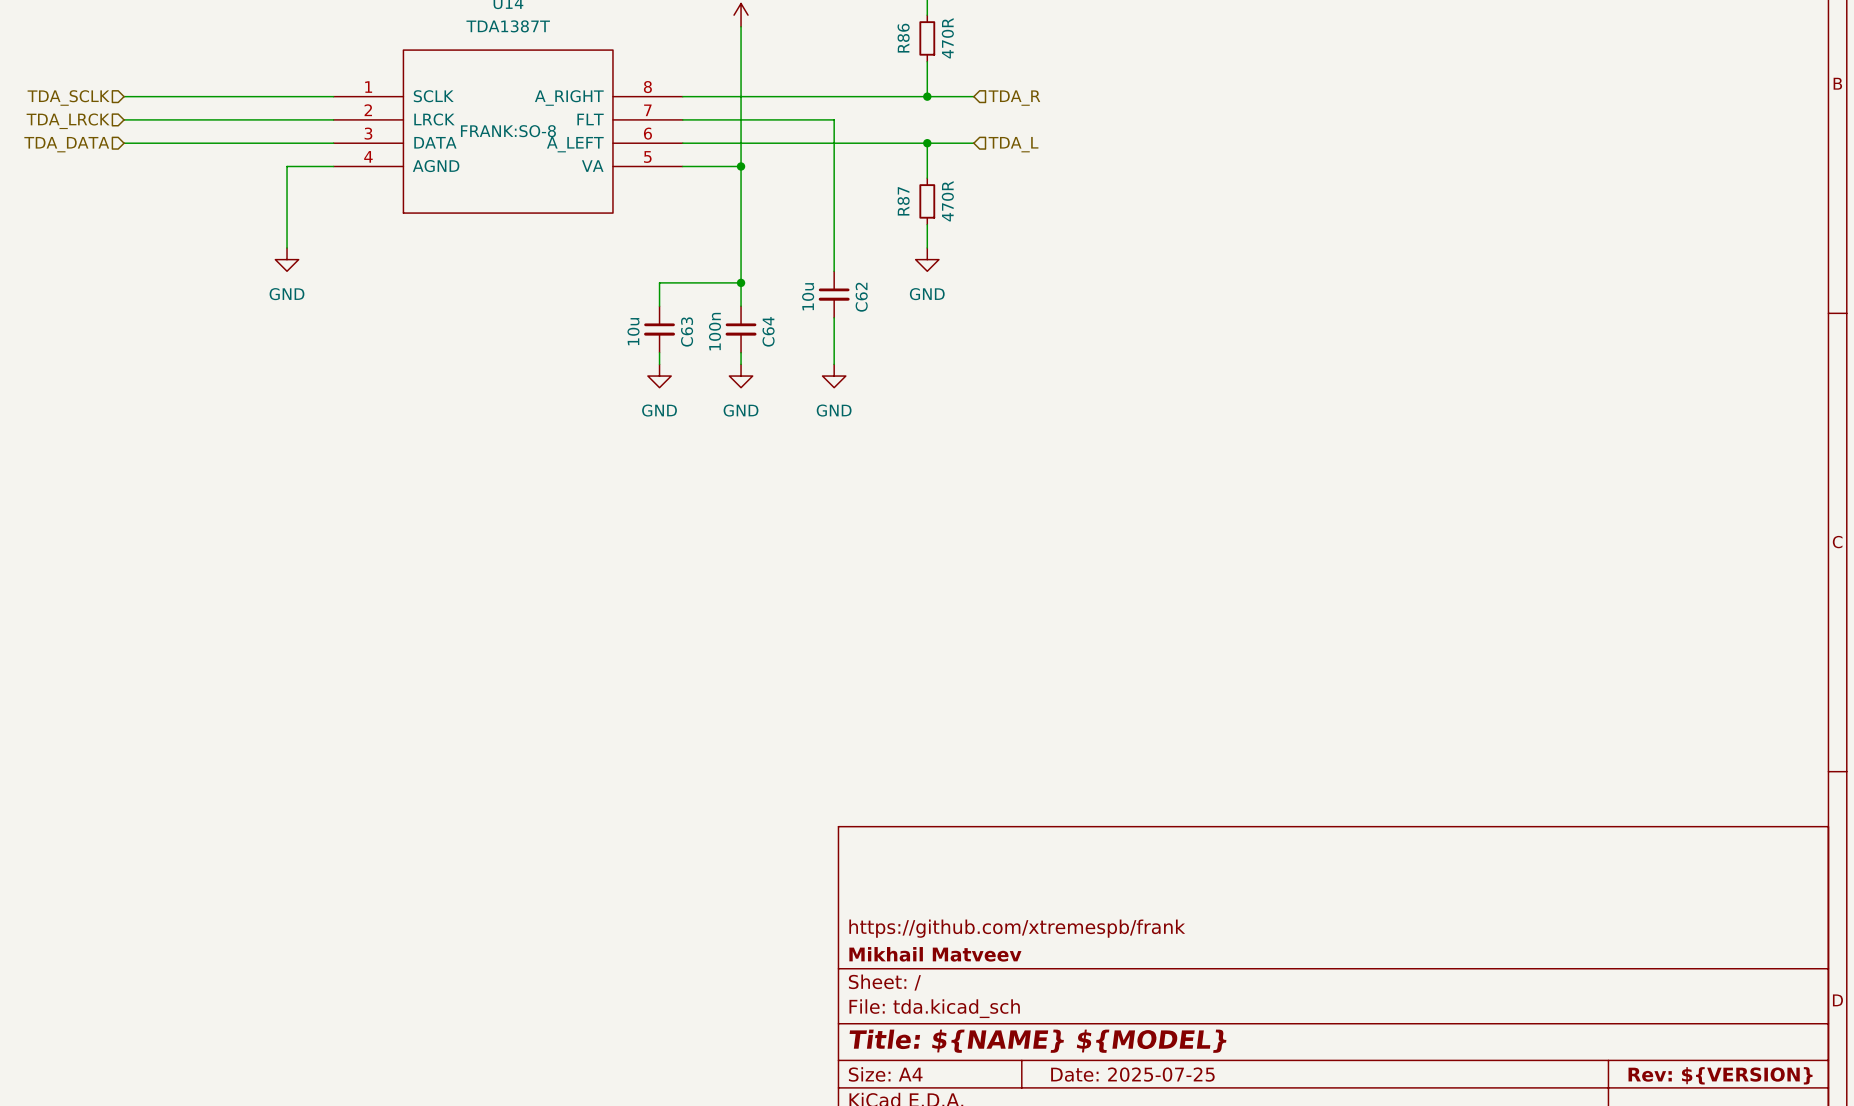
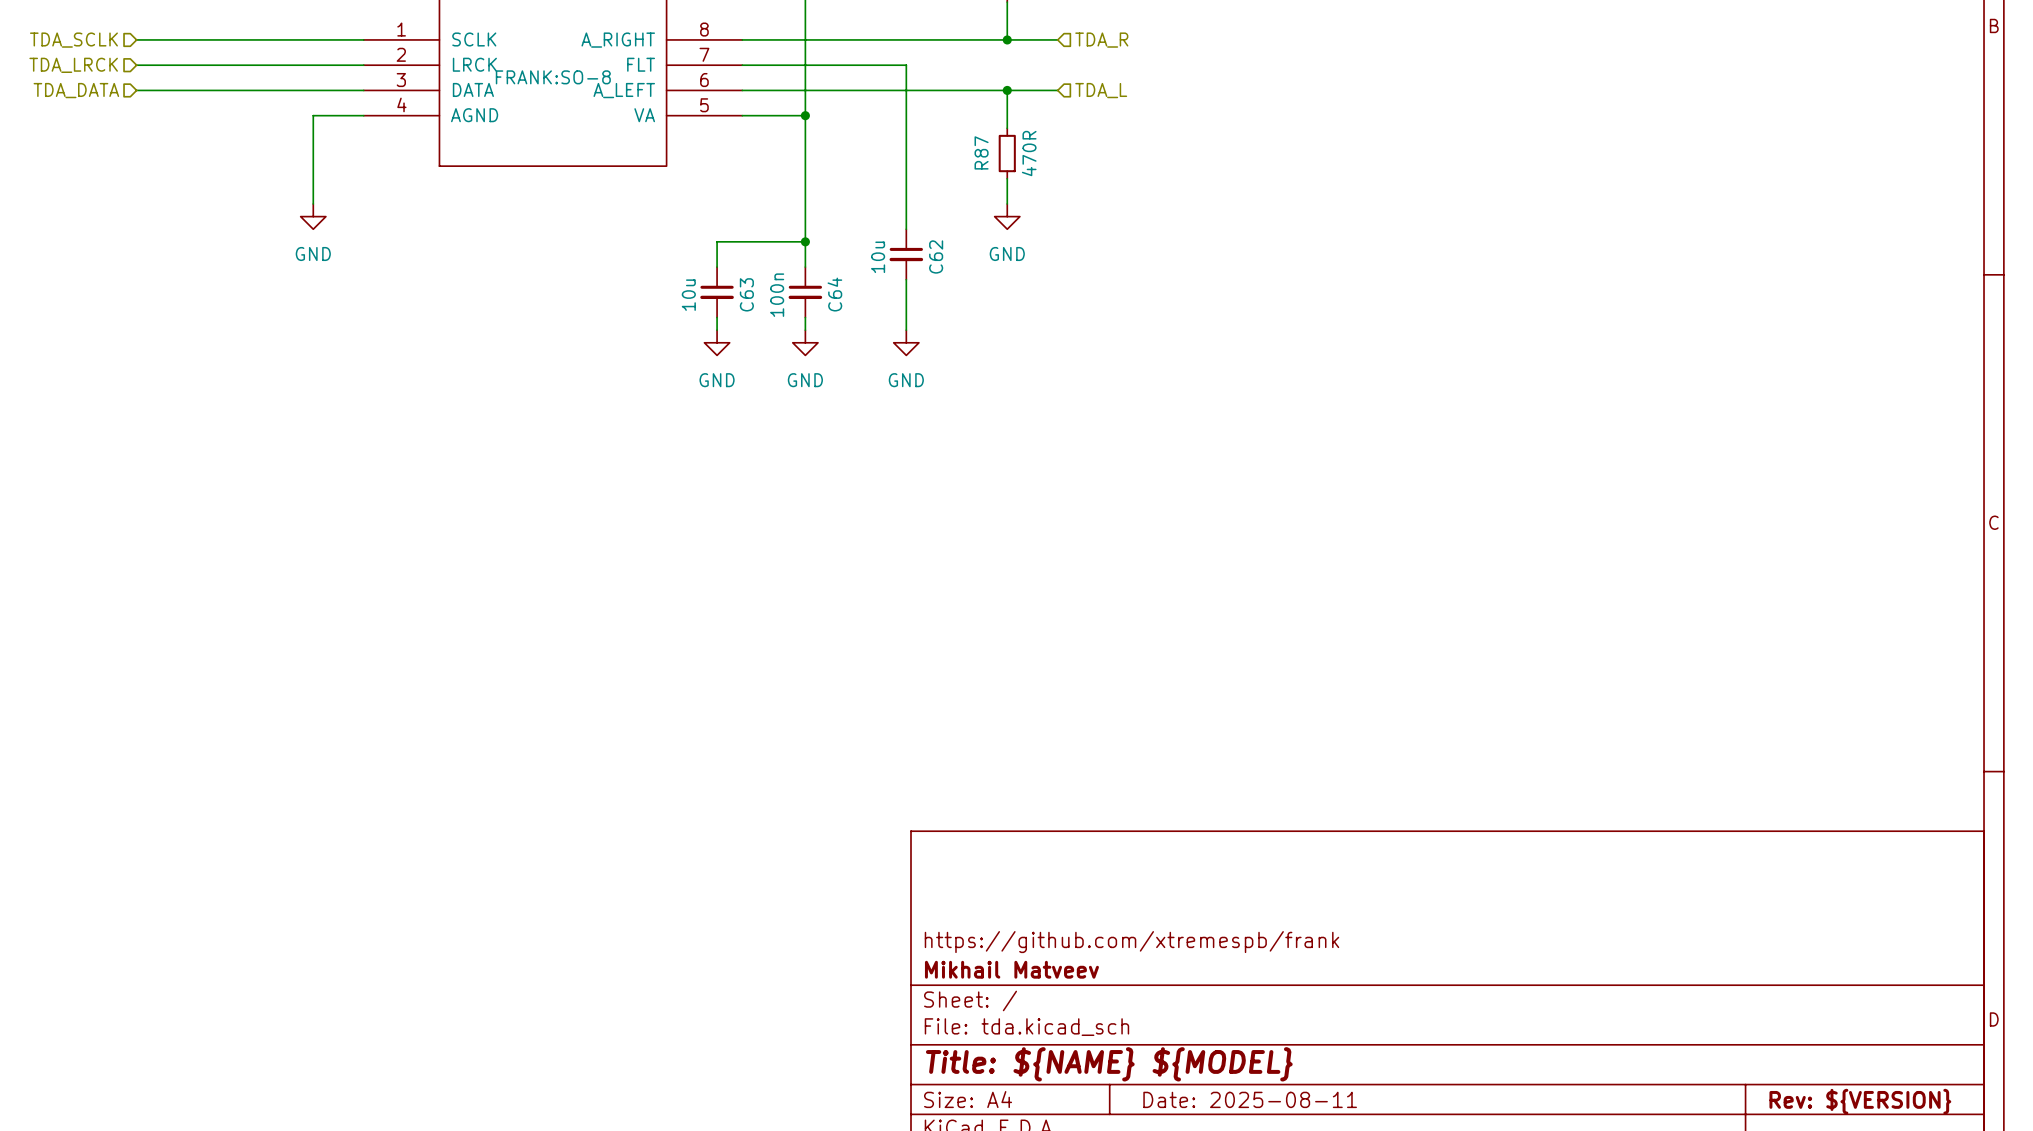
title block: Date: 2025-07-25 (1132, 1074) -> Date: 2025-08-11 (1250, 1099)

